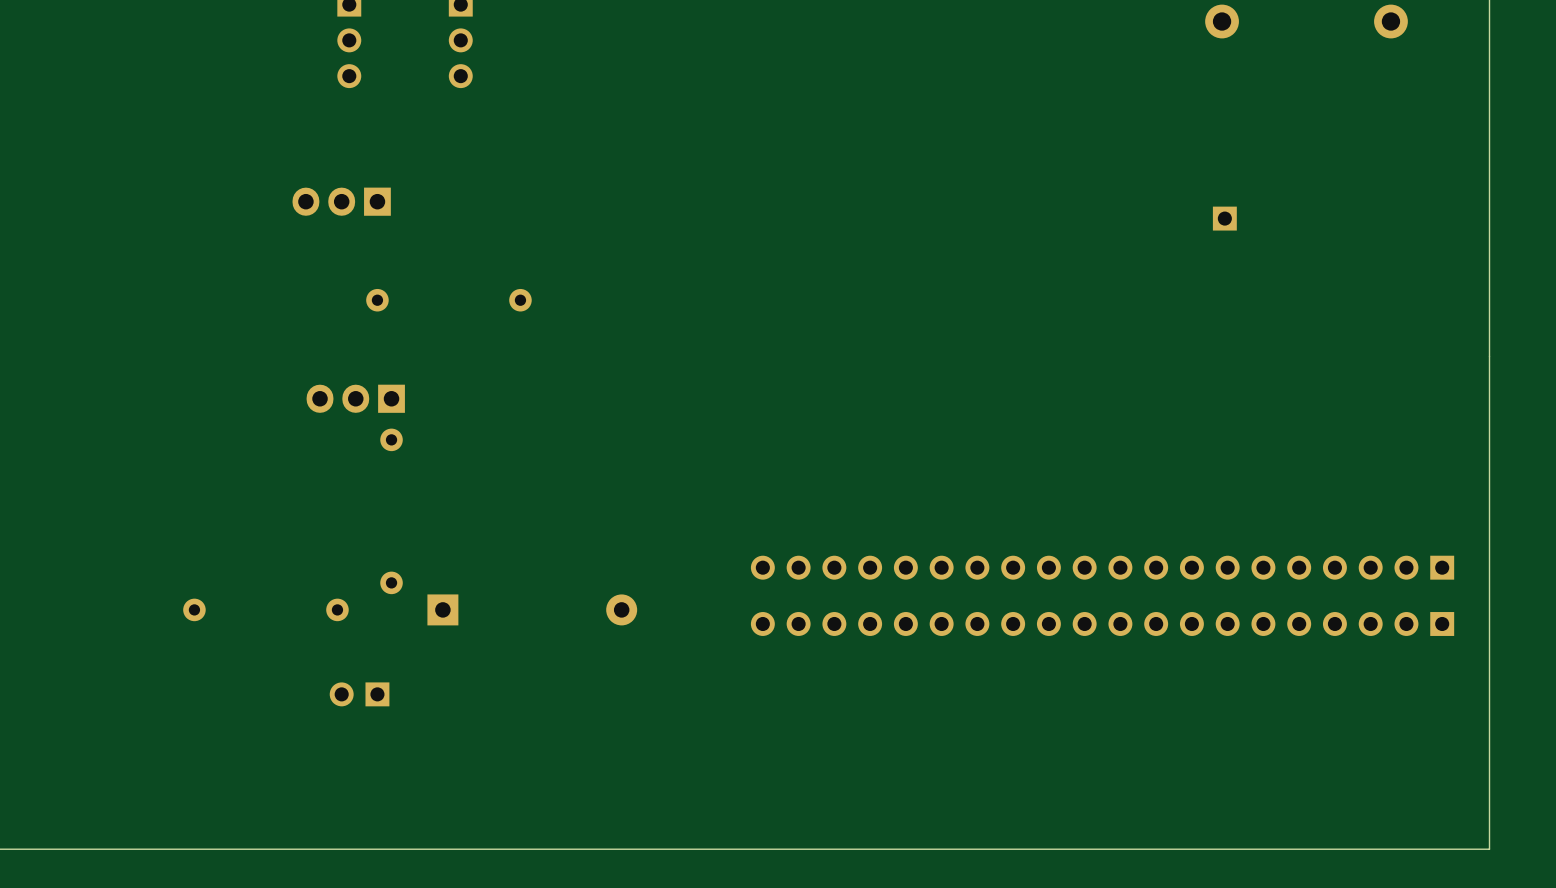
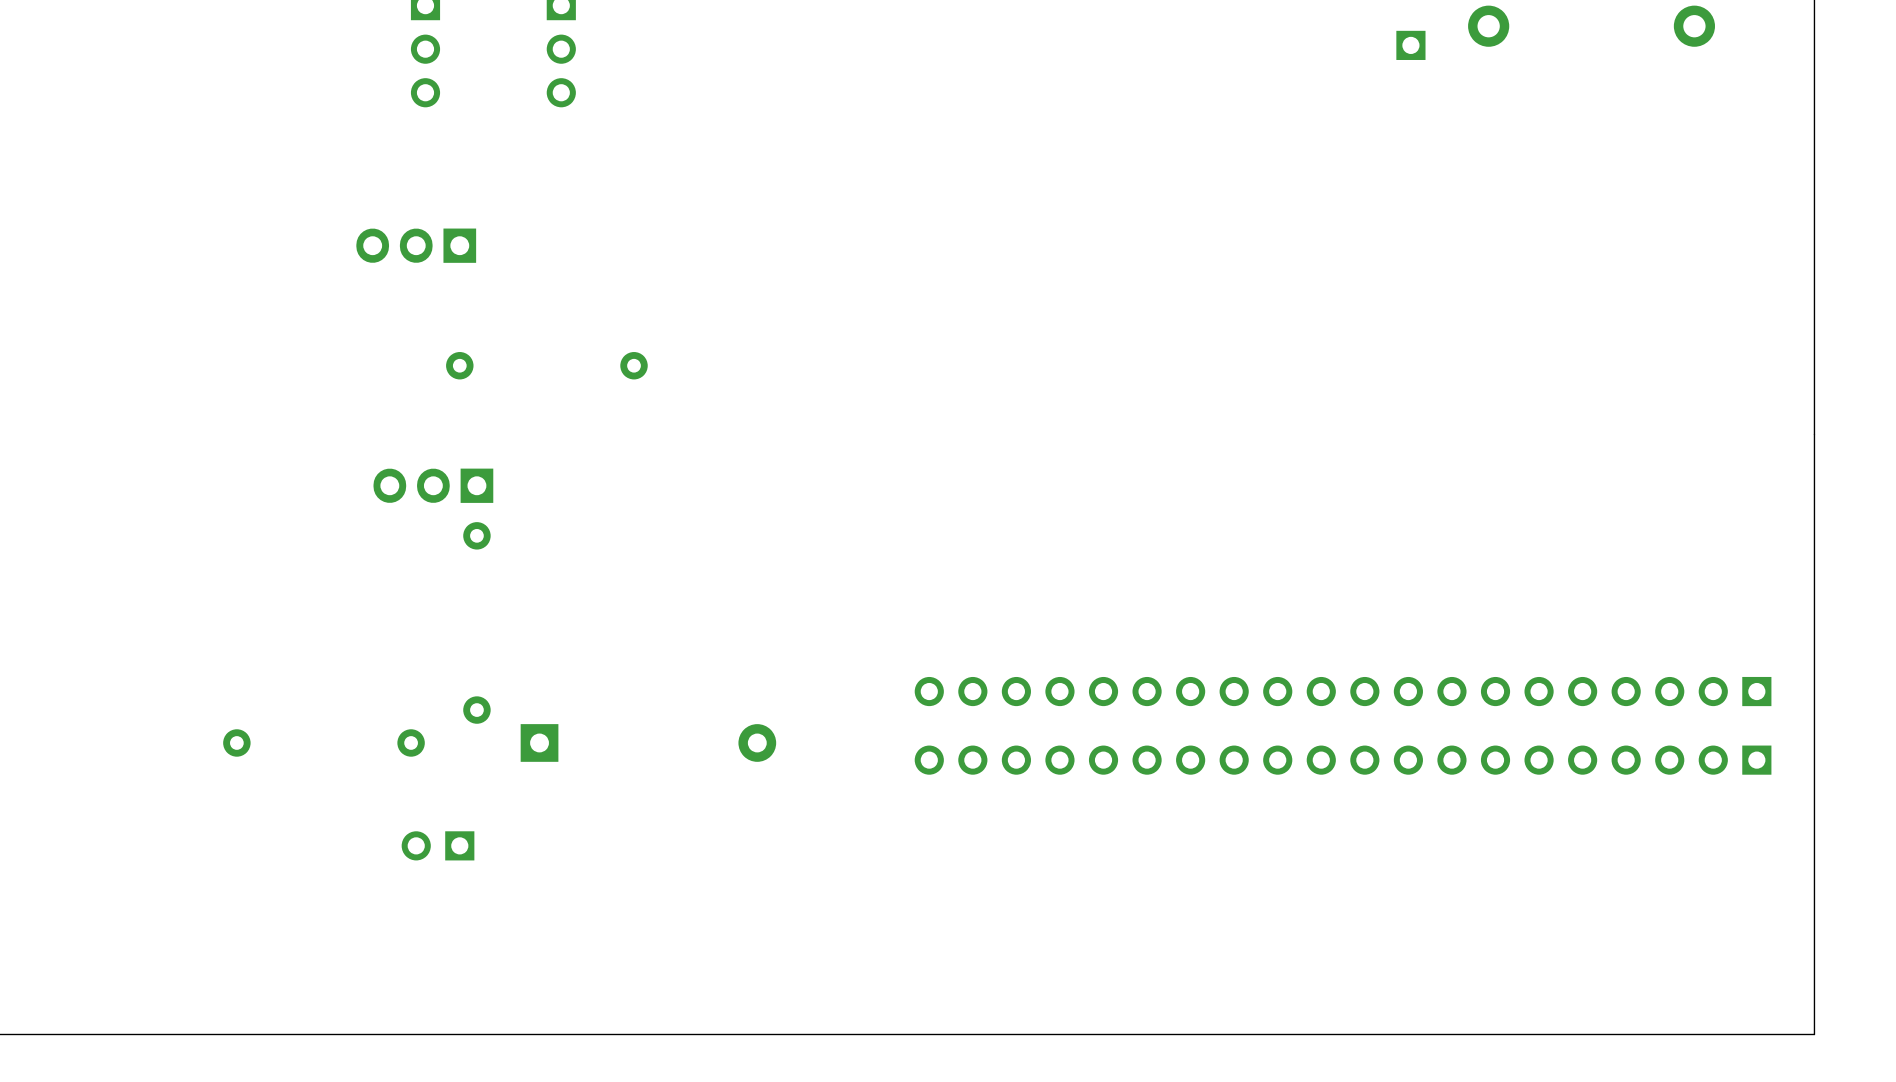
part position: (1224, 218) -> (1410, 45)

